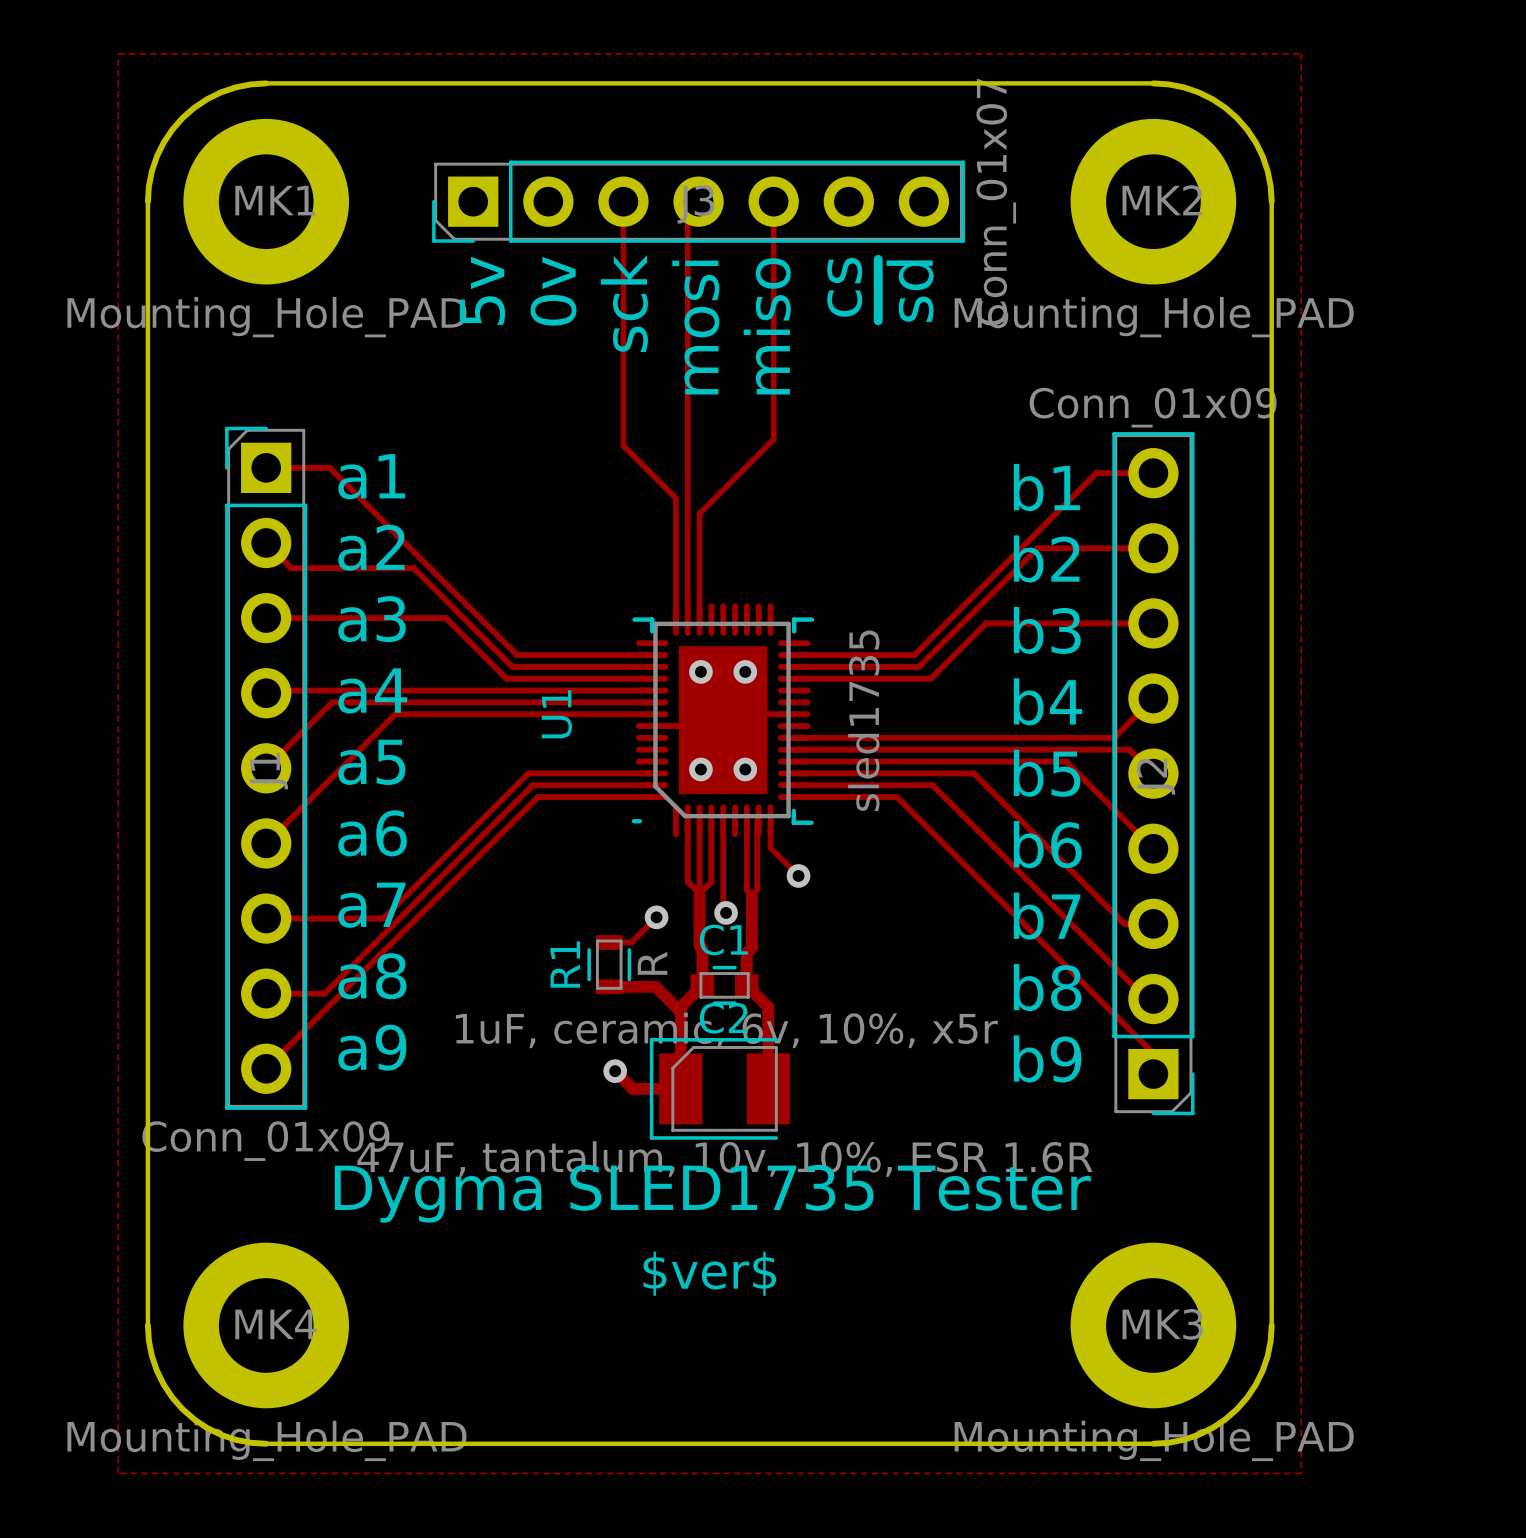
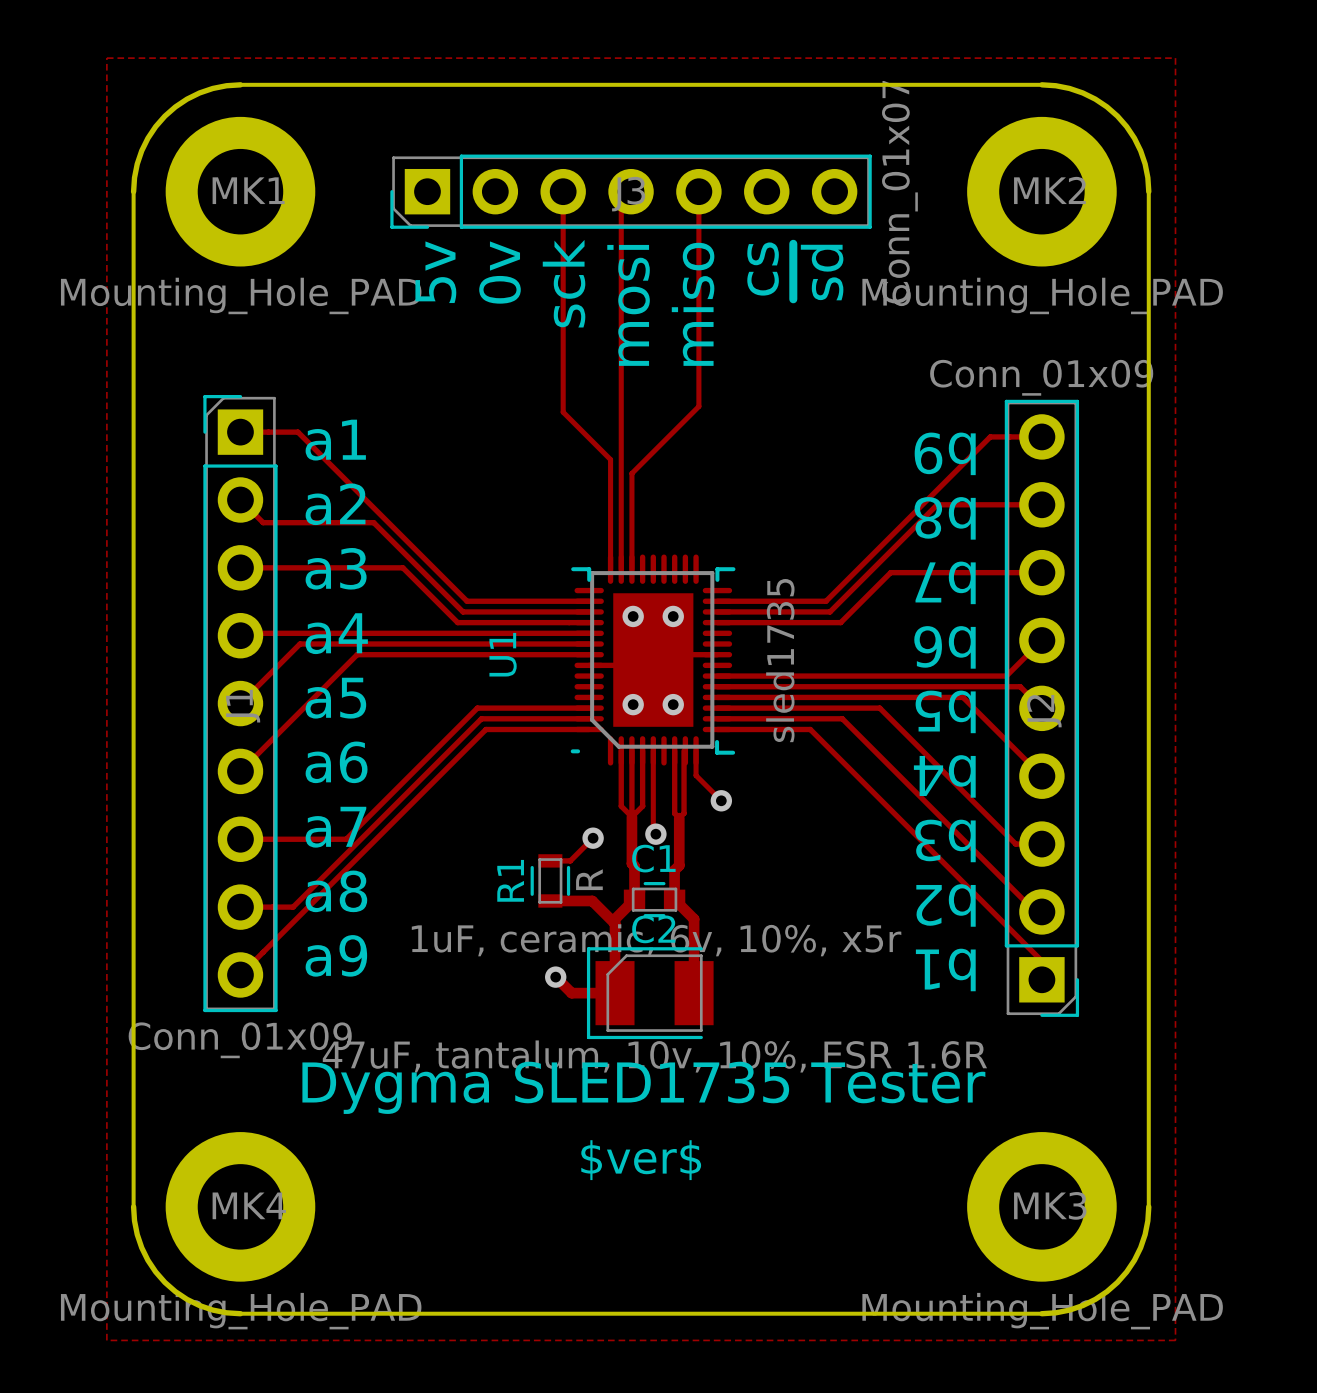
text: b1 (1046, 487) -> b9 (945, 453)
text: b2 (1046, 558) -> b8 (945, 518)
text: b3 (1047, 630) -> b7 (945, 582)
text: b4 (1048, 701) -> b6 (944, 647)
text rotation: 0° (1047, 773) -> 180° (945, 711)
text: b6 (1047, 844) -> b4 (944, 776)
text: b7 (1047, 916) -> b3 (945, 840)
text: b8 (1047, 987) -> b2 (946, 905)
text: b9 (1047, 1058) -> b1 (945, 969)

